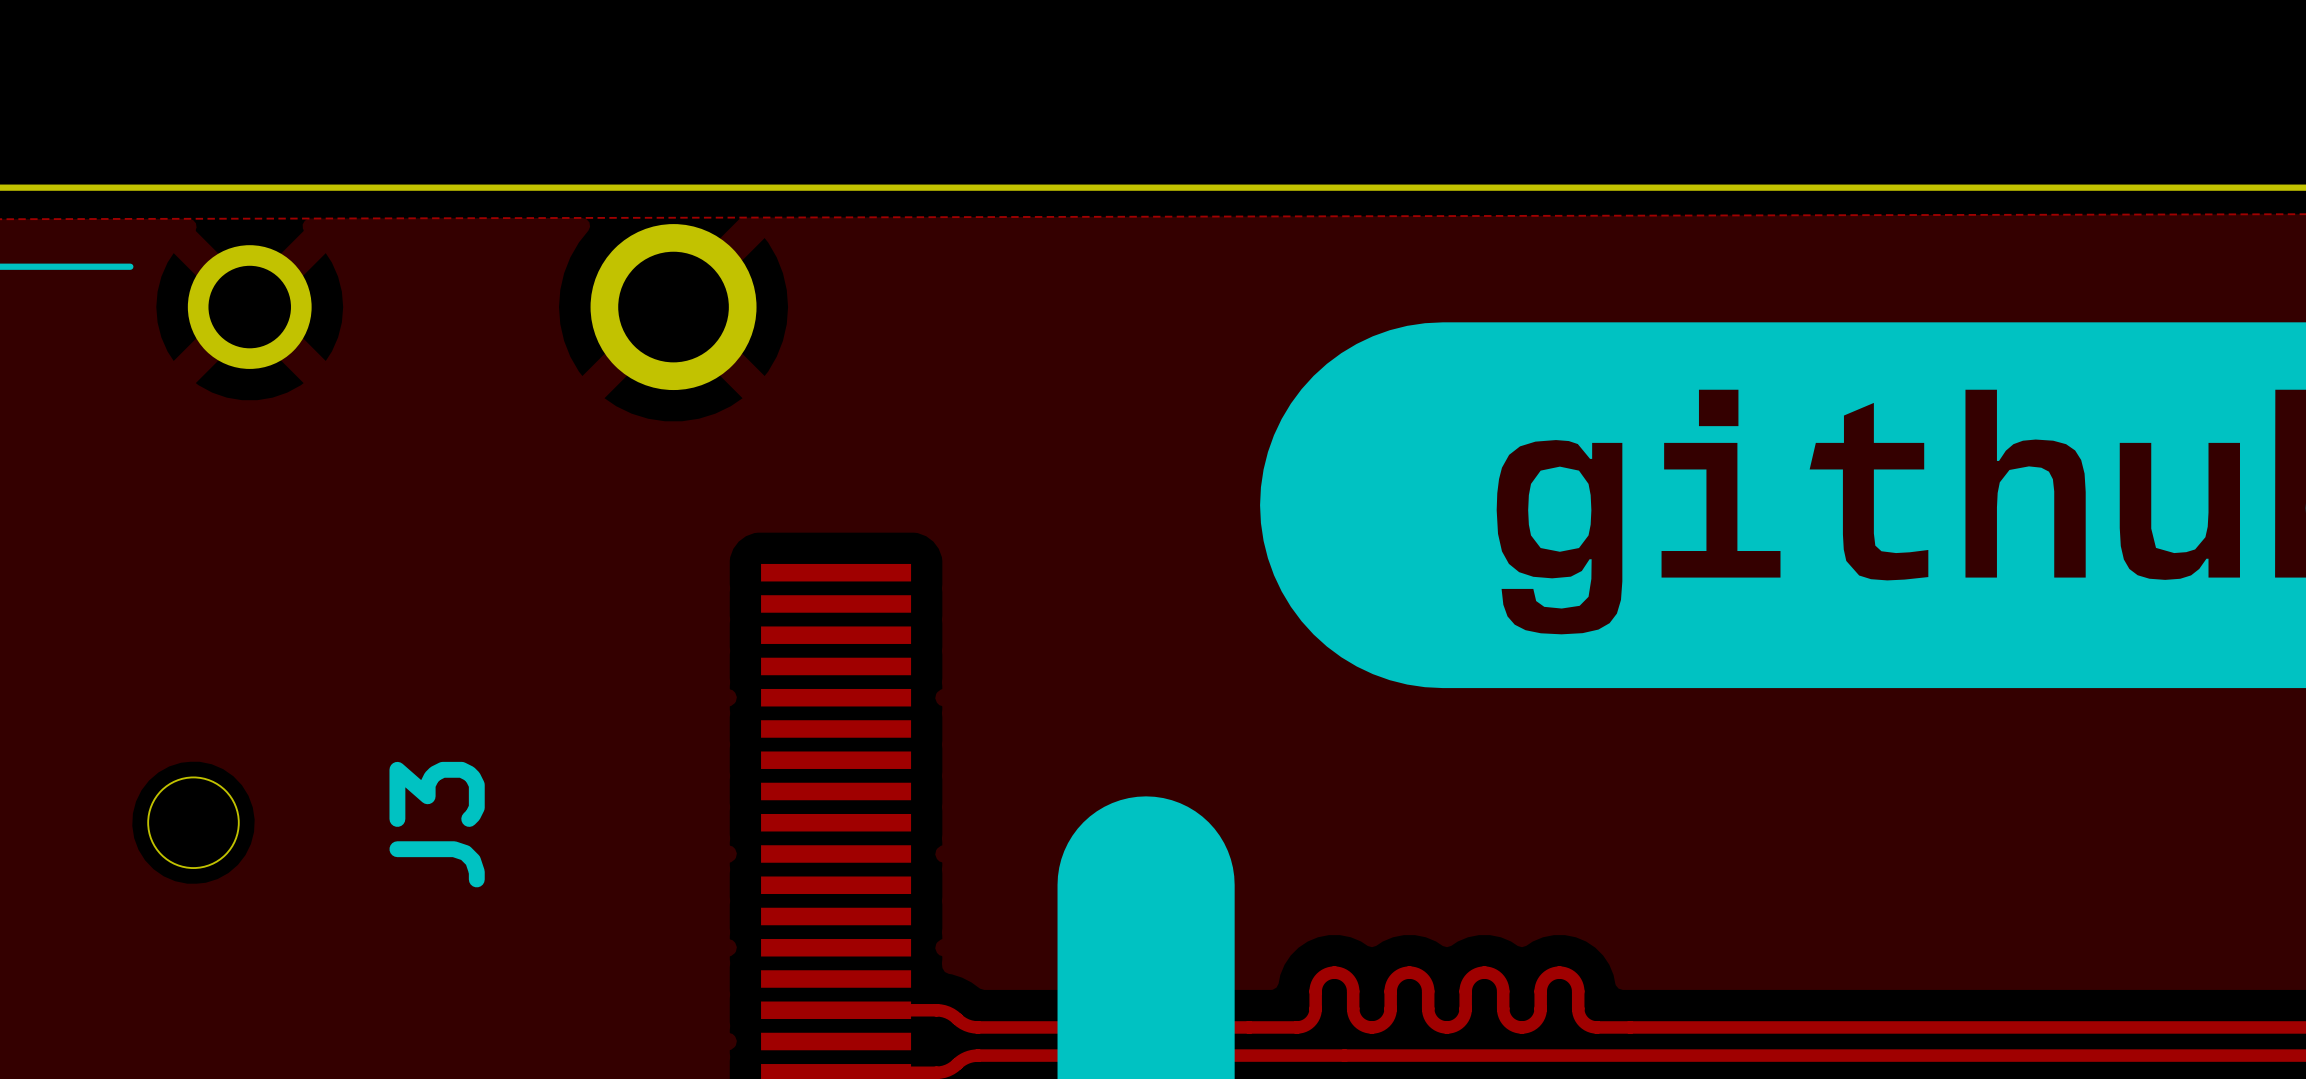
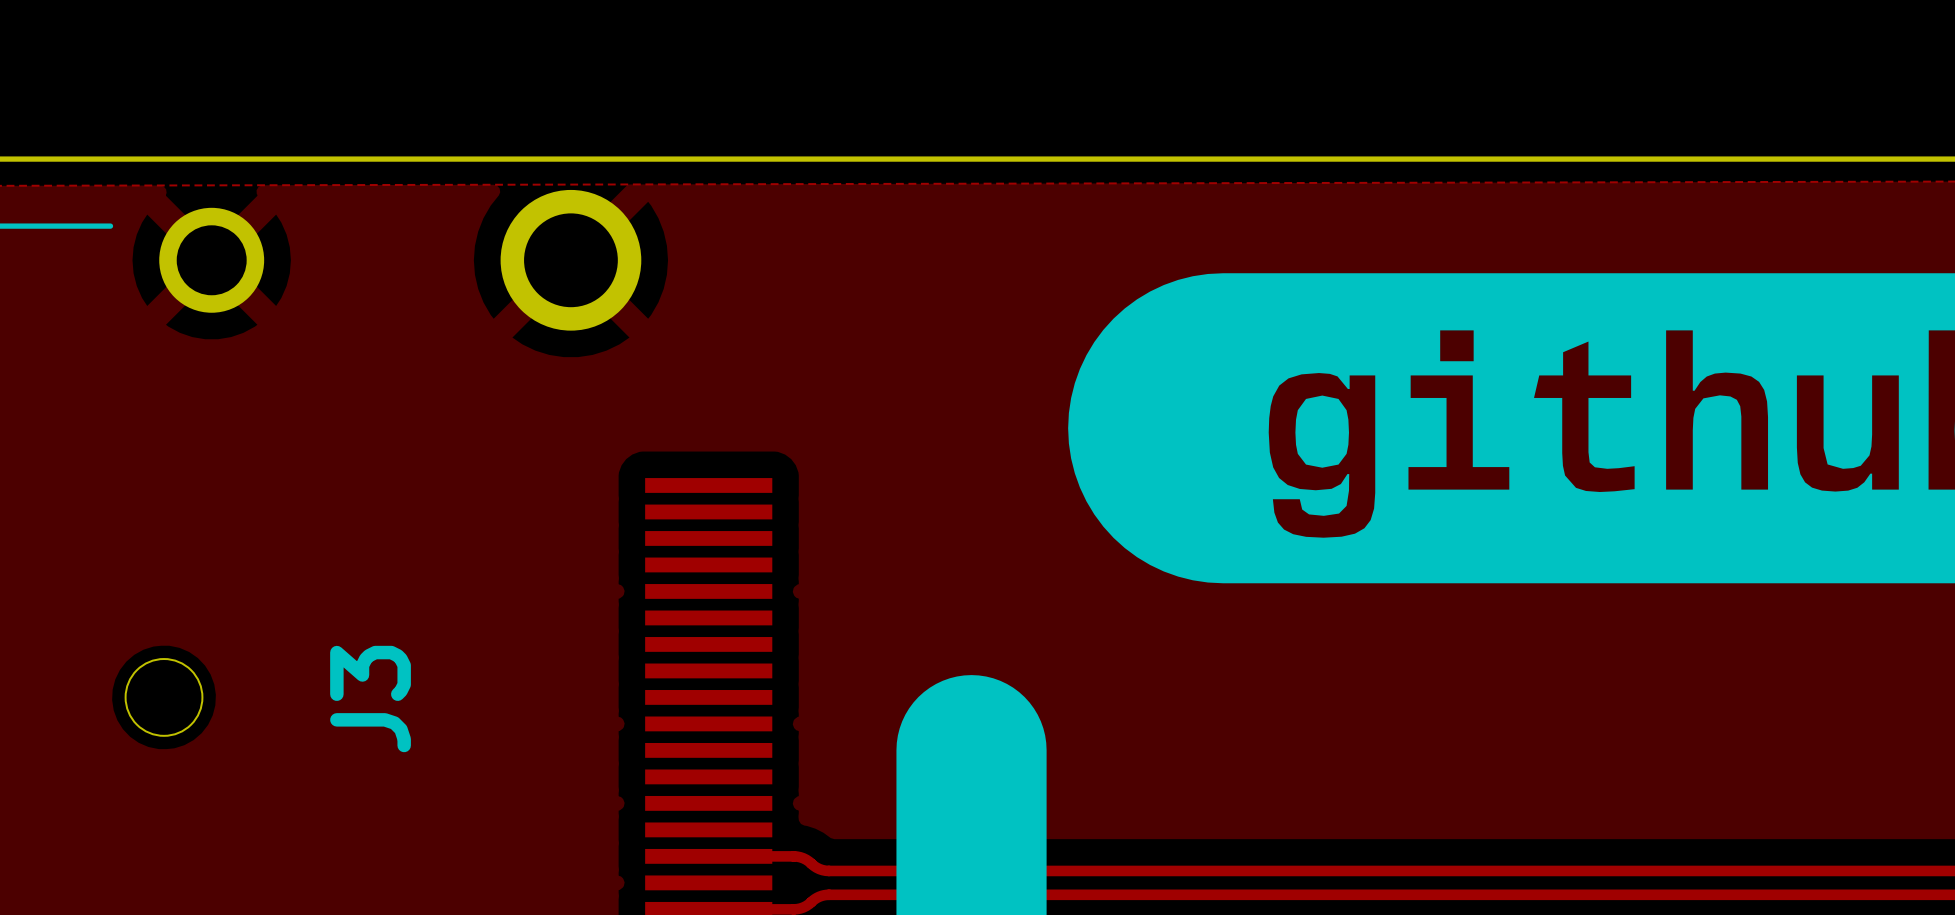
track: (1296, 1027) (1304, 1026) (1311, 1020) (1315, 1011) (1317, 984) (1323, 976) (1334, 972) (1343, 975) (1349, 979) (1353, 988) (1354, 1015) (1360, 1023) (1371, 1027) (1381, 1024) (1388, 1018) (1390, 1011) (1392, 984) (1396, 978) (1404, 973) (1414, 973) (1424, 979) (1428, 988) (1429, 1015) (1437, 1024) (1446, 1027) (1456, 1024) (1464, 1015) (1465, 988) (1469, 979) (1479, 973) (1491, 974) (1497, 978) (1502, 986) (1503, 1011) (1505, 1018) (1512, 1024) (1521, 1027) (1531, 1024) (1539, 1015) (1540, 988) (1544, 979) (1554, 973) (1564, 973) (1572, 978) (1576, 984) (1578, 1011) (1580, 1018) (1587, 1024) (1596, 1027) -> (1099, 870) (1353, 870)

